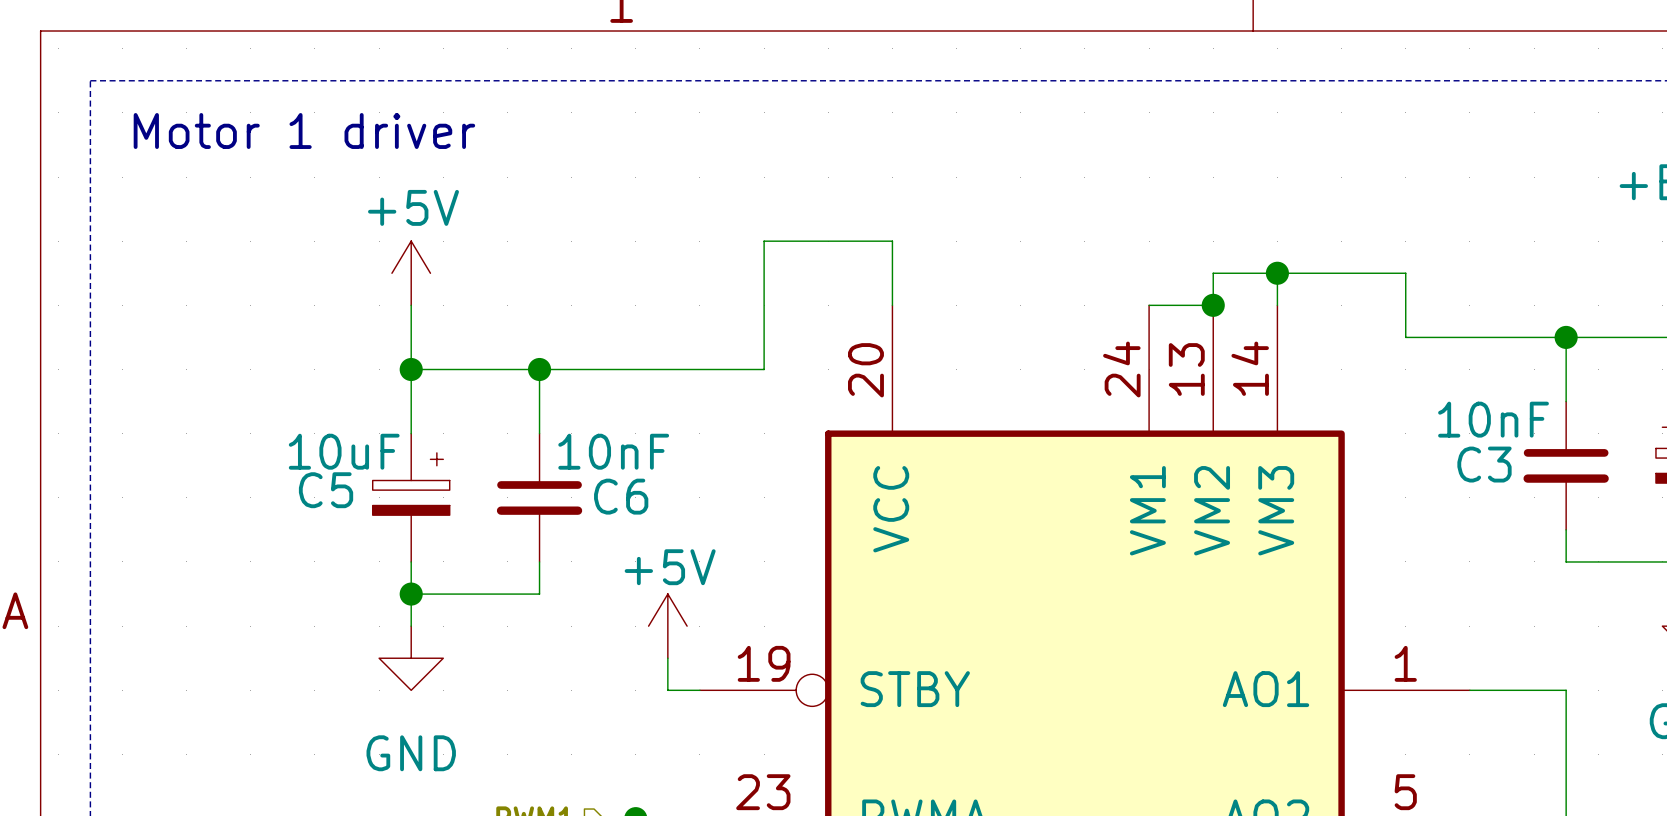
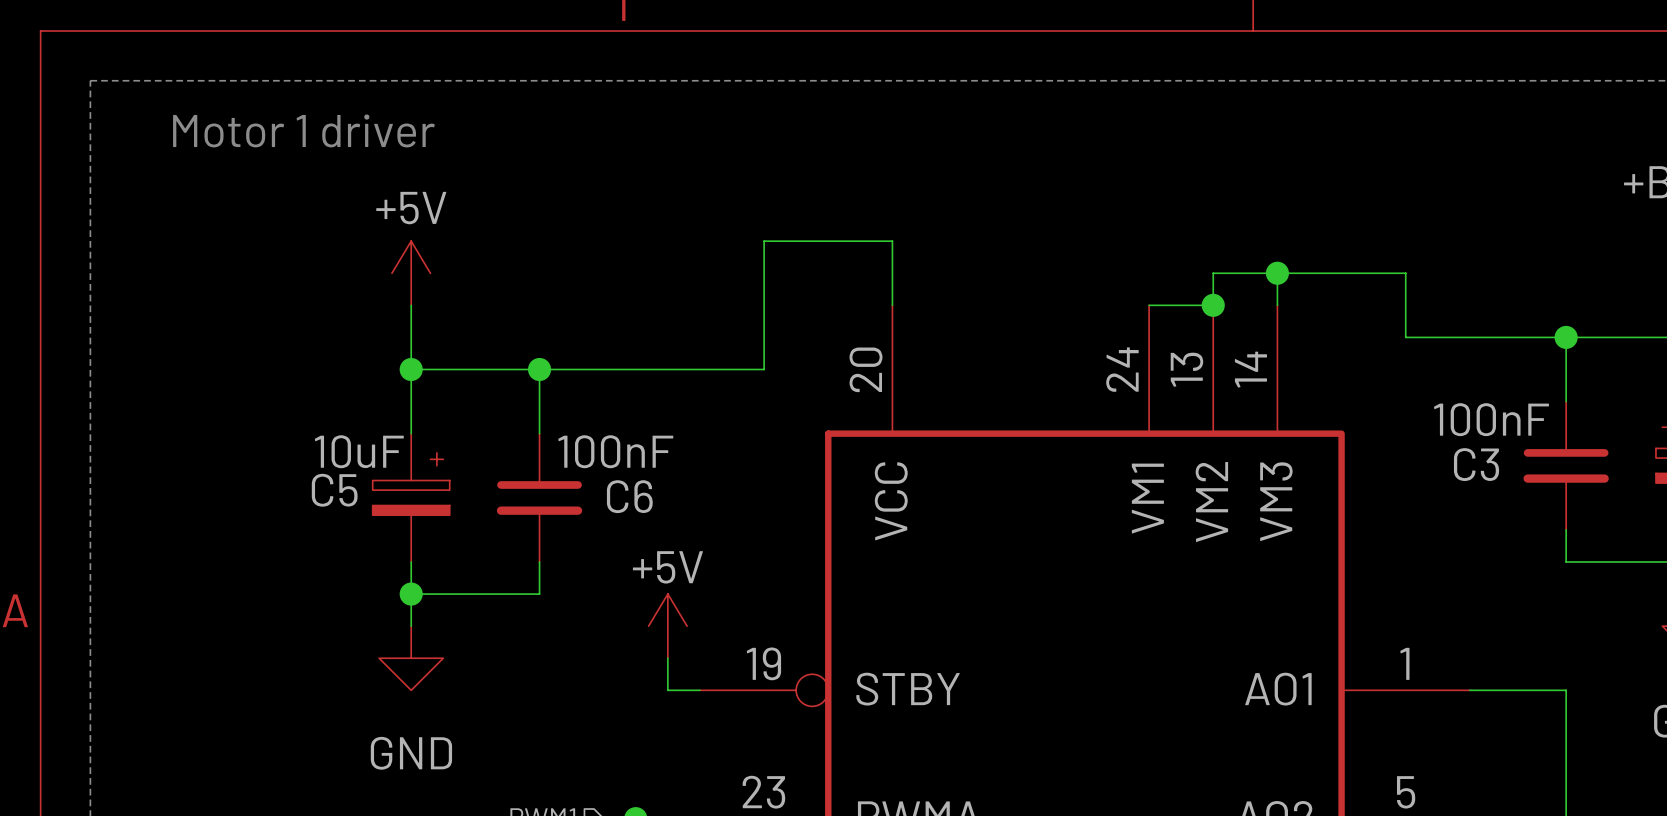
C3 value: 10nF (1493, 419) -> 100nF (1491, 419)
C6 value: 10nF (613, 451) -> 100nF (615, 451)

